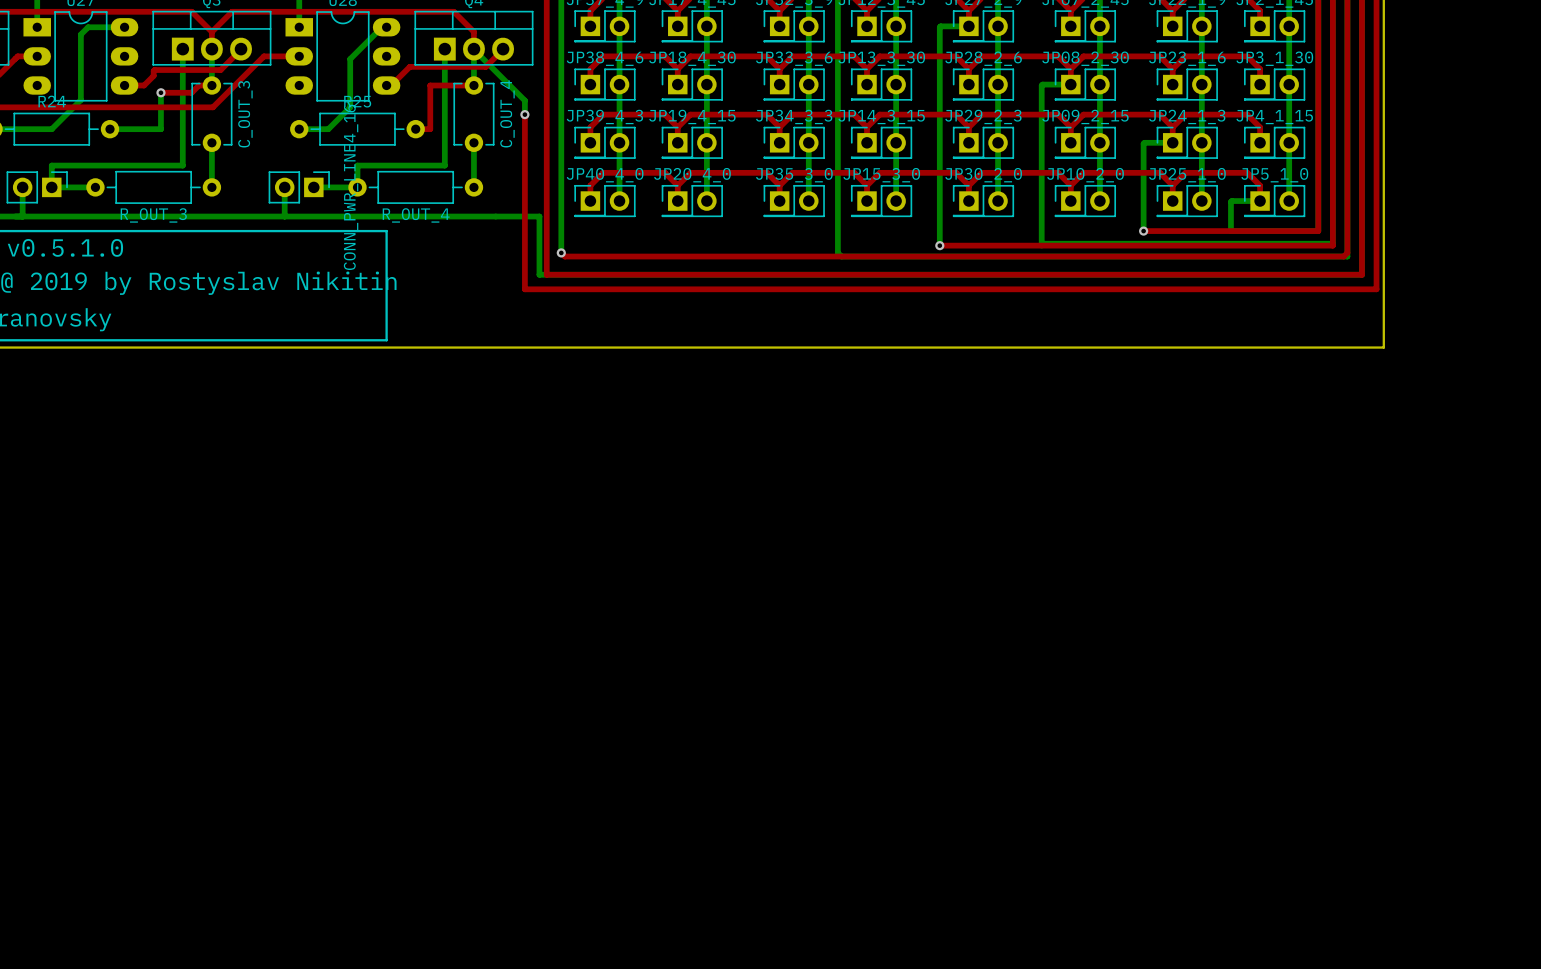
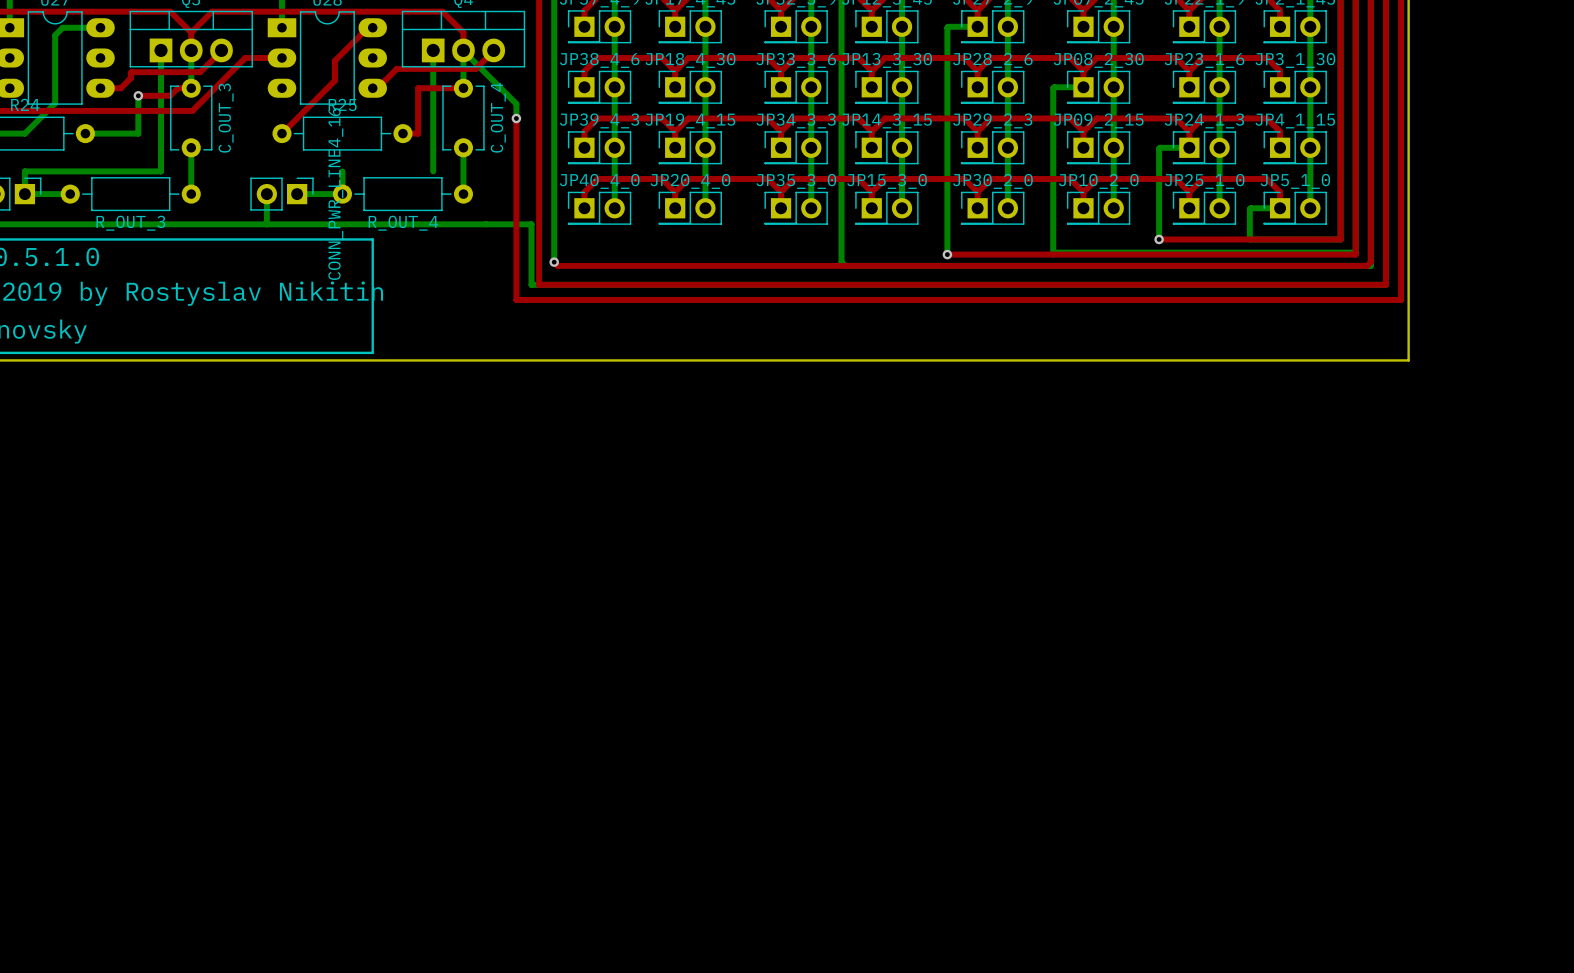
top track: none -> (372, 27) (367, 27) (334, 60) (334, 80) (282, 133)
bottom track: (386, 27) (382, 27) (350, 59) (350, 107) (328, 129) (299, 129) -> none
bottom track: (357, 165) (444, 165) -> none

